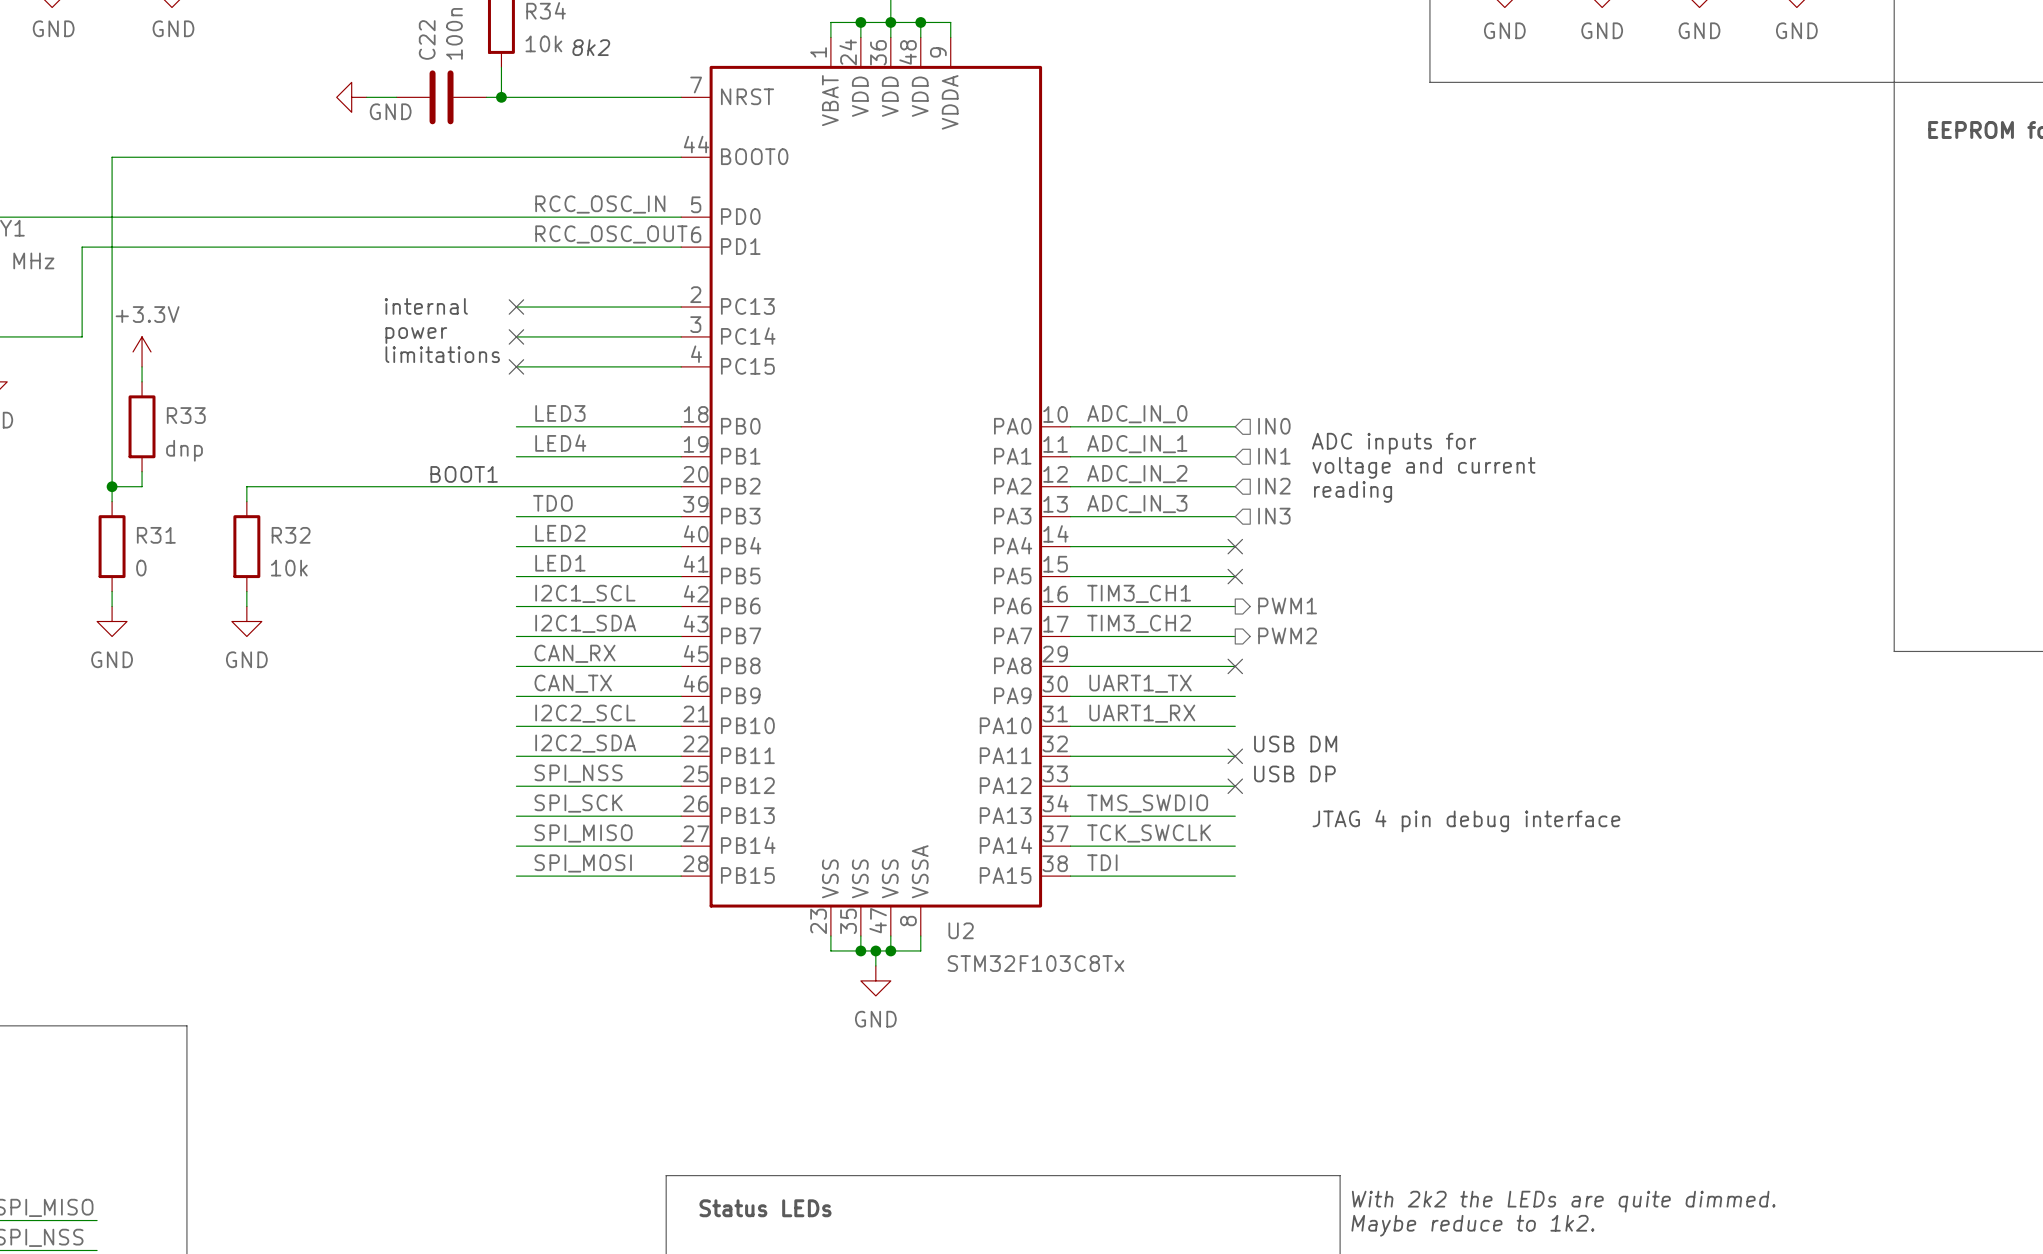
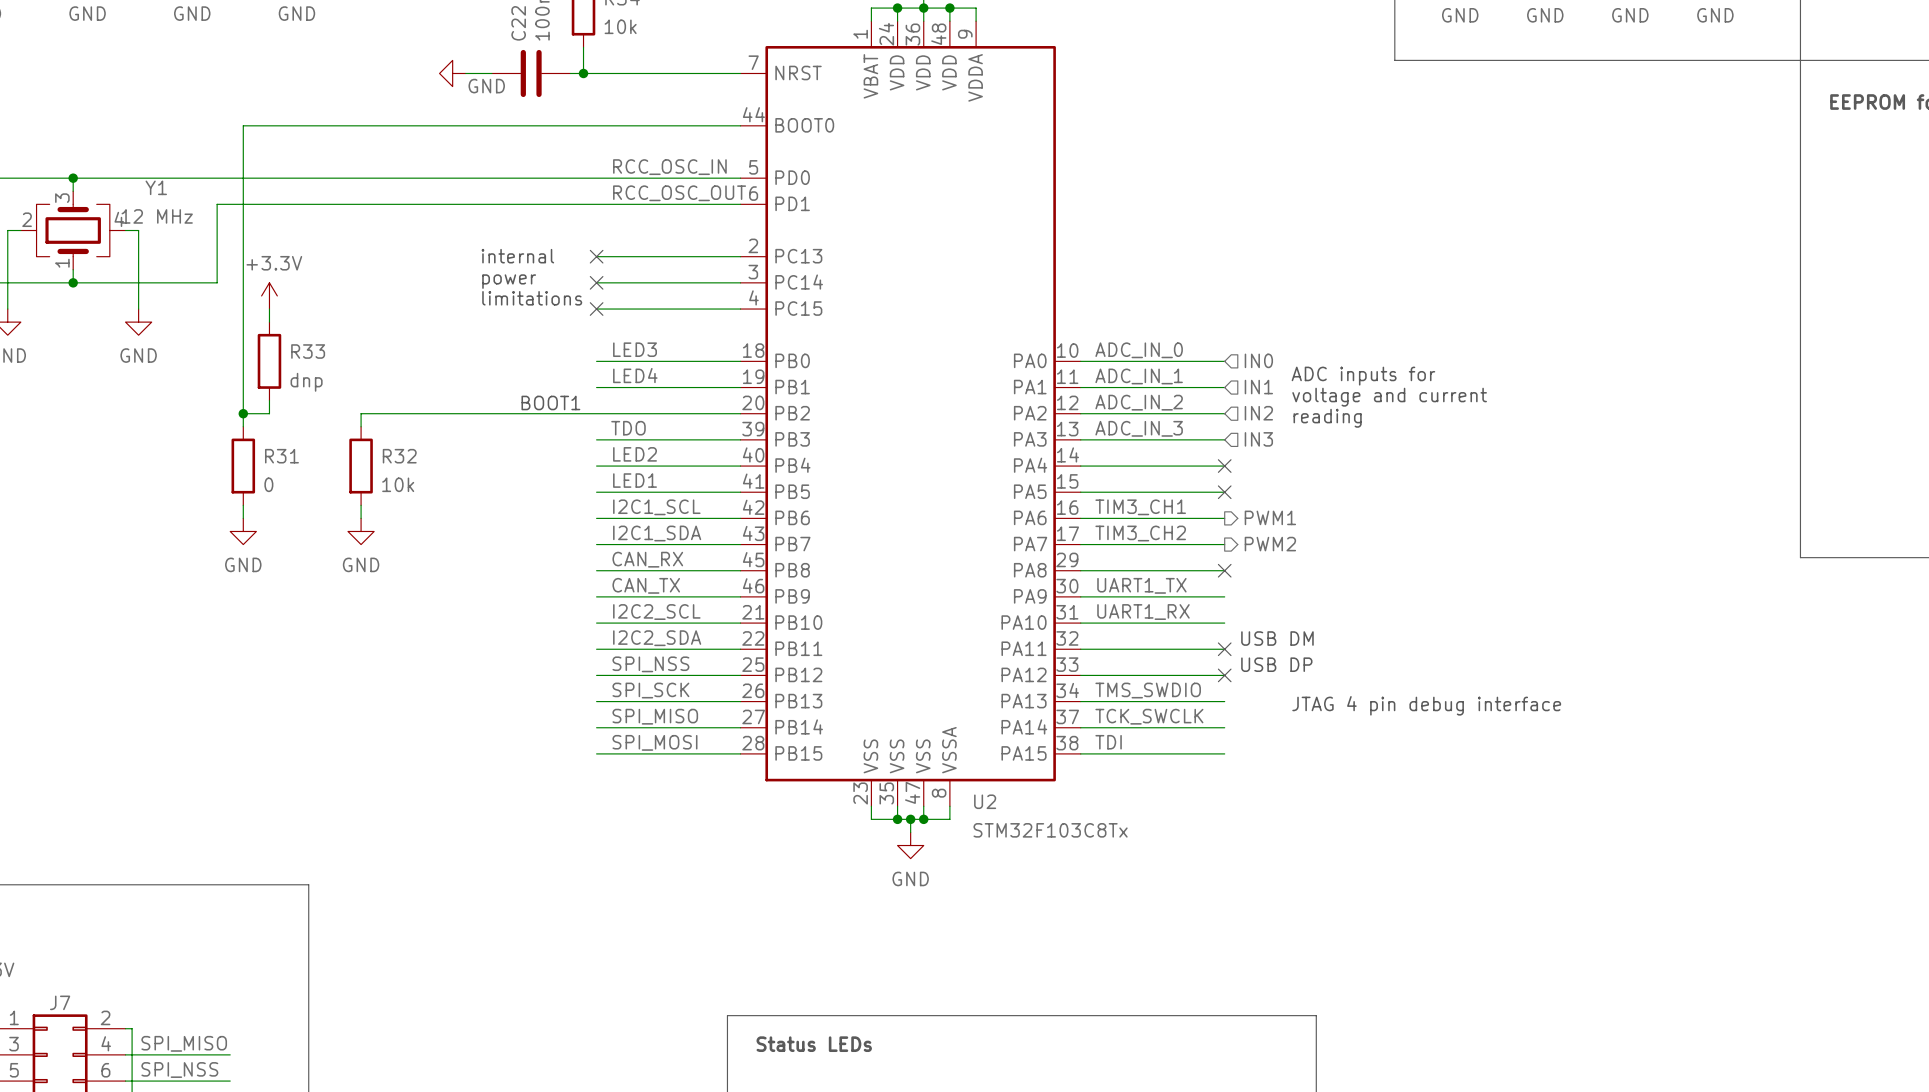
text: 8k2 (591, 47) -> none
text: With 2k2 the LEDs are quite dimmed. (1563, 1201) -> none
text: Maybe reduce to 1k2. (1472, 1225) -> none

